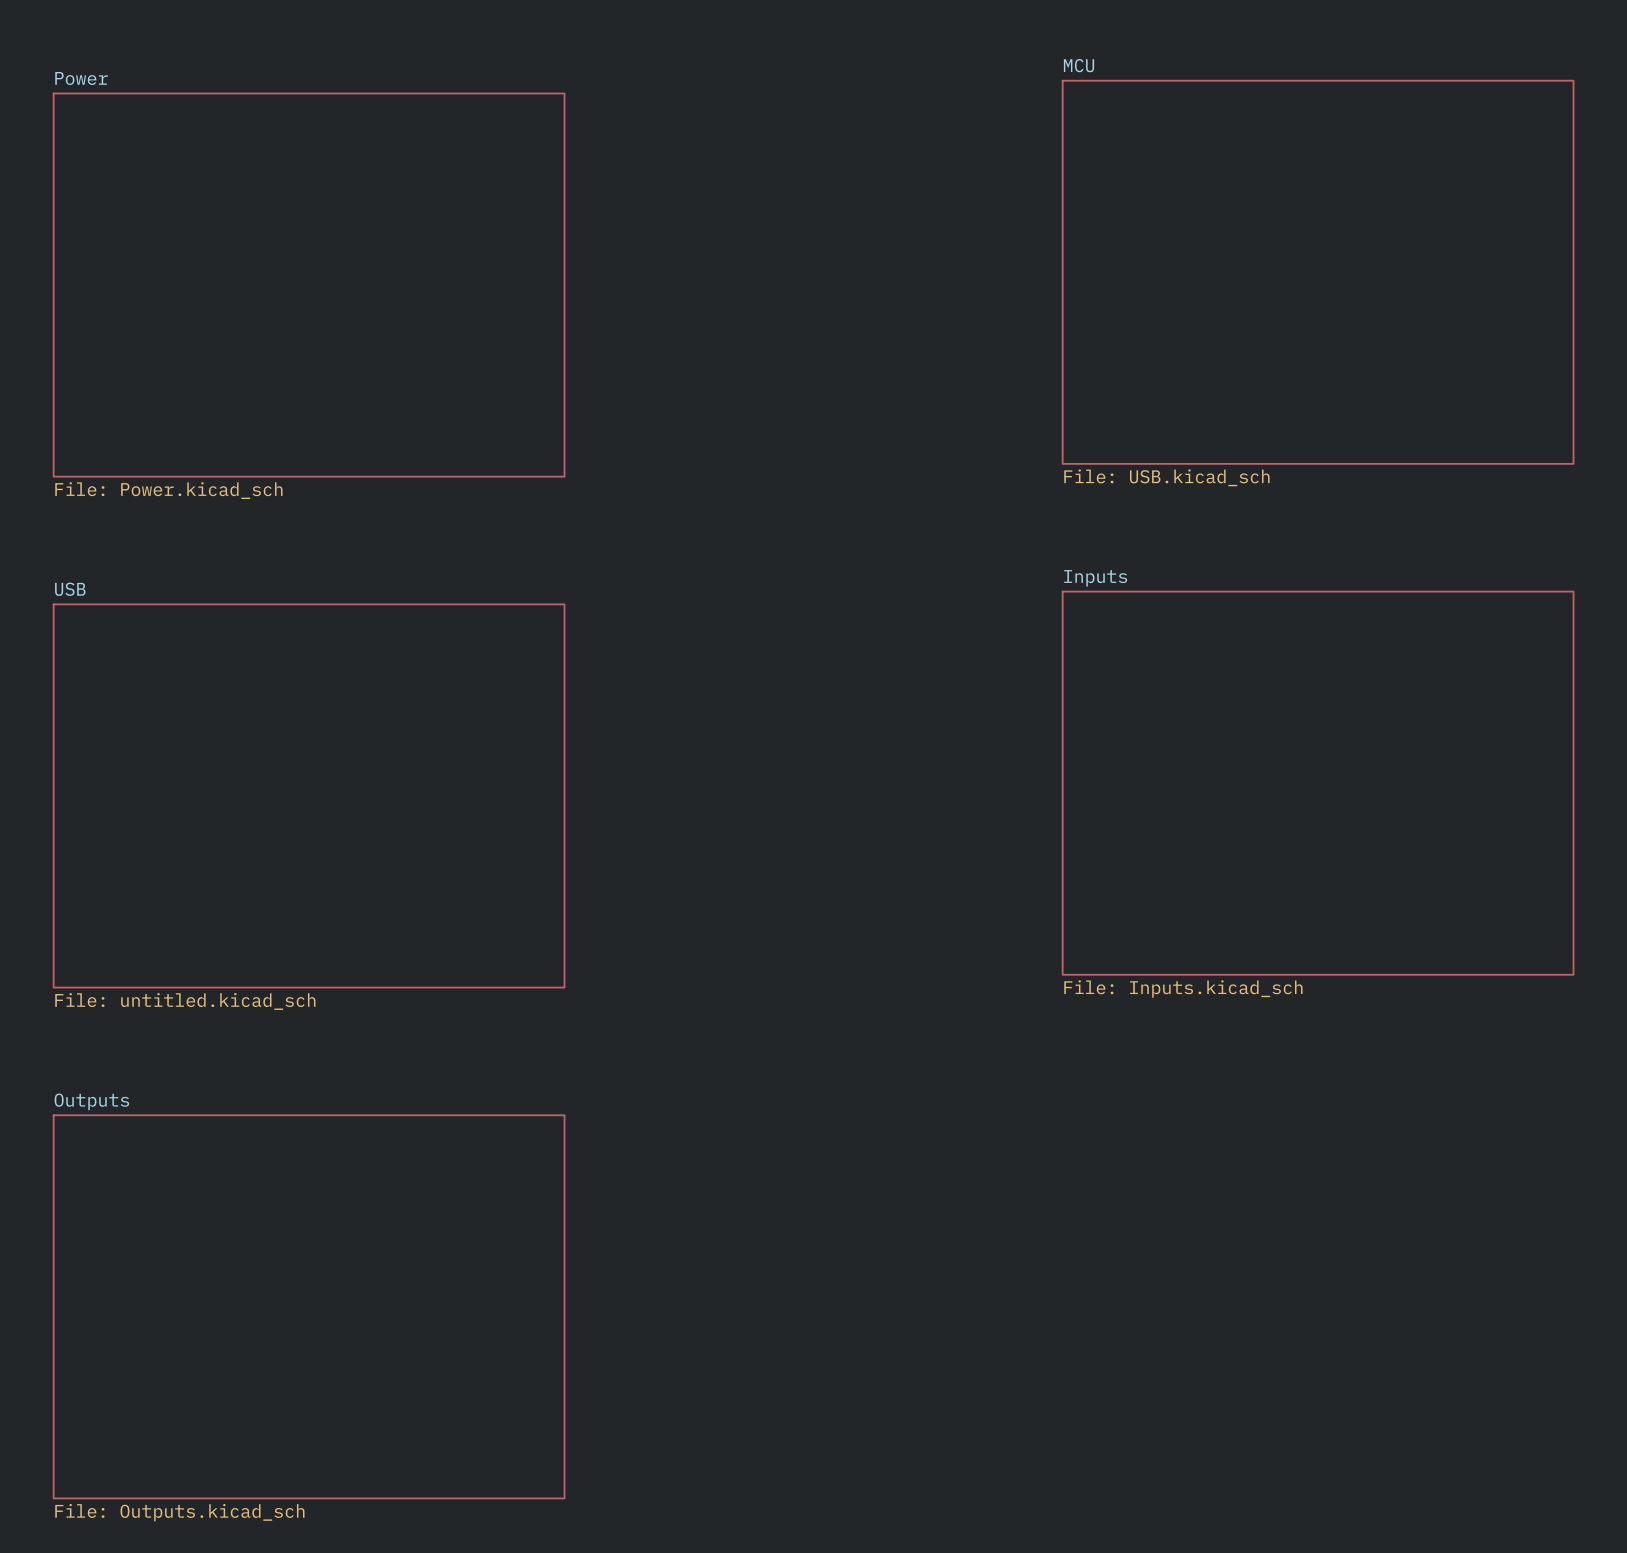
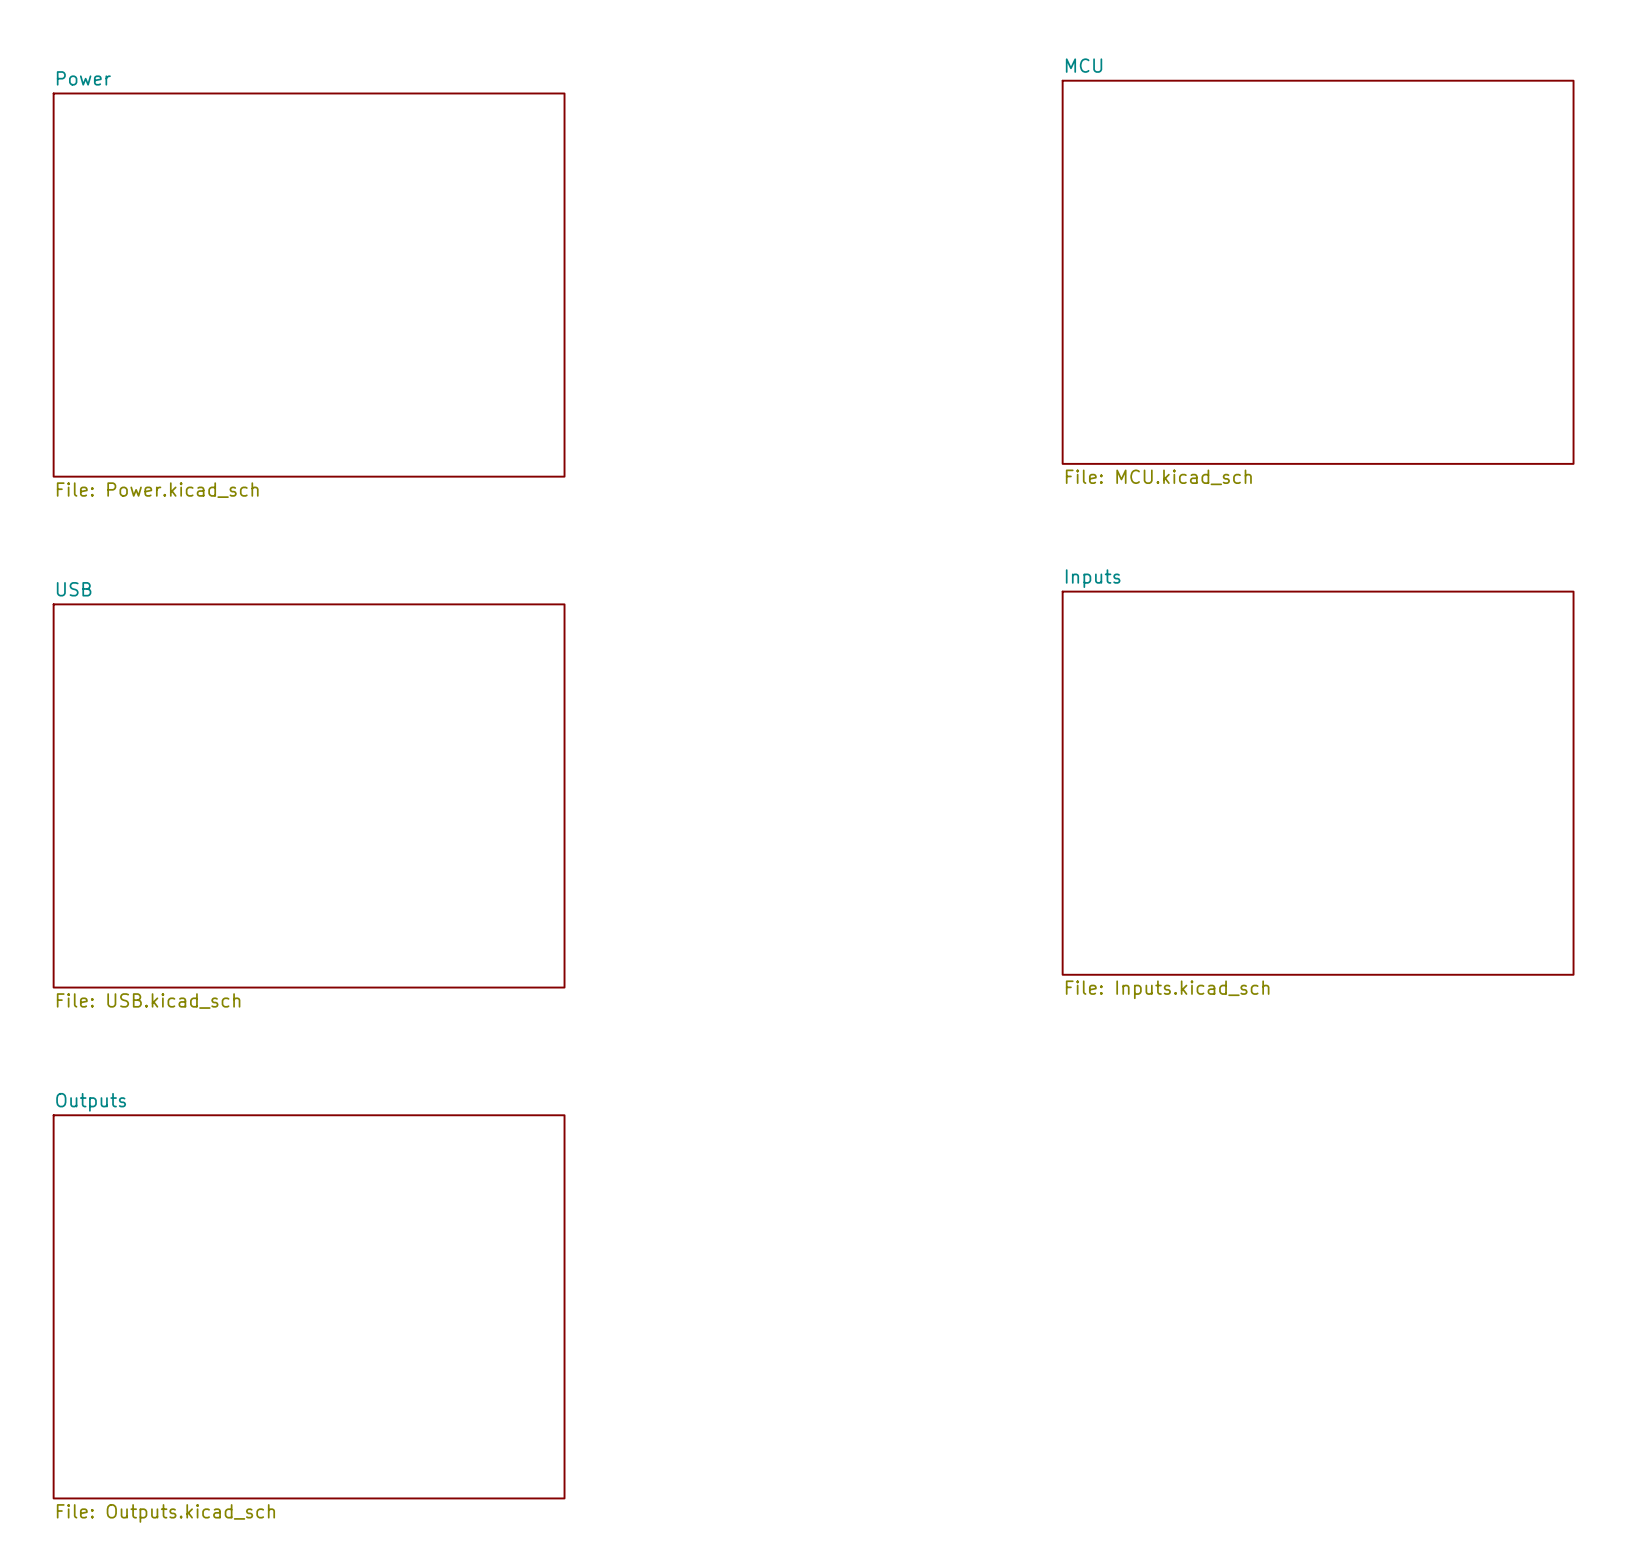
sheet MCU value: File: USB.kicad_sch (1166, 477) -> File: MCU.kicad_sch (1158, 477)
sheet USB value: File: untitled.kicad_sch (185, 1001) -> File: USB.kicad_sch (148, 1001)

